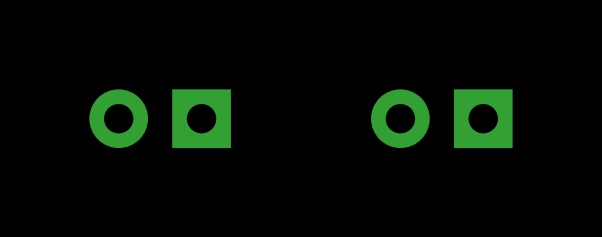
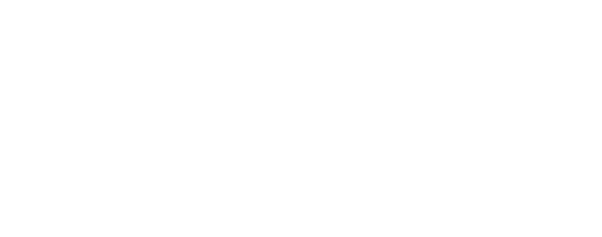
part: (160, 118) -> none
part: (441, 118) -> none

